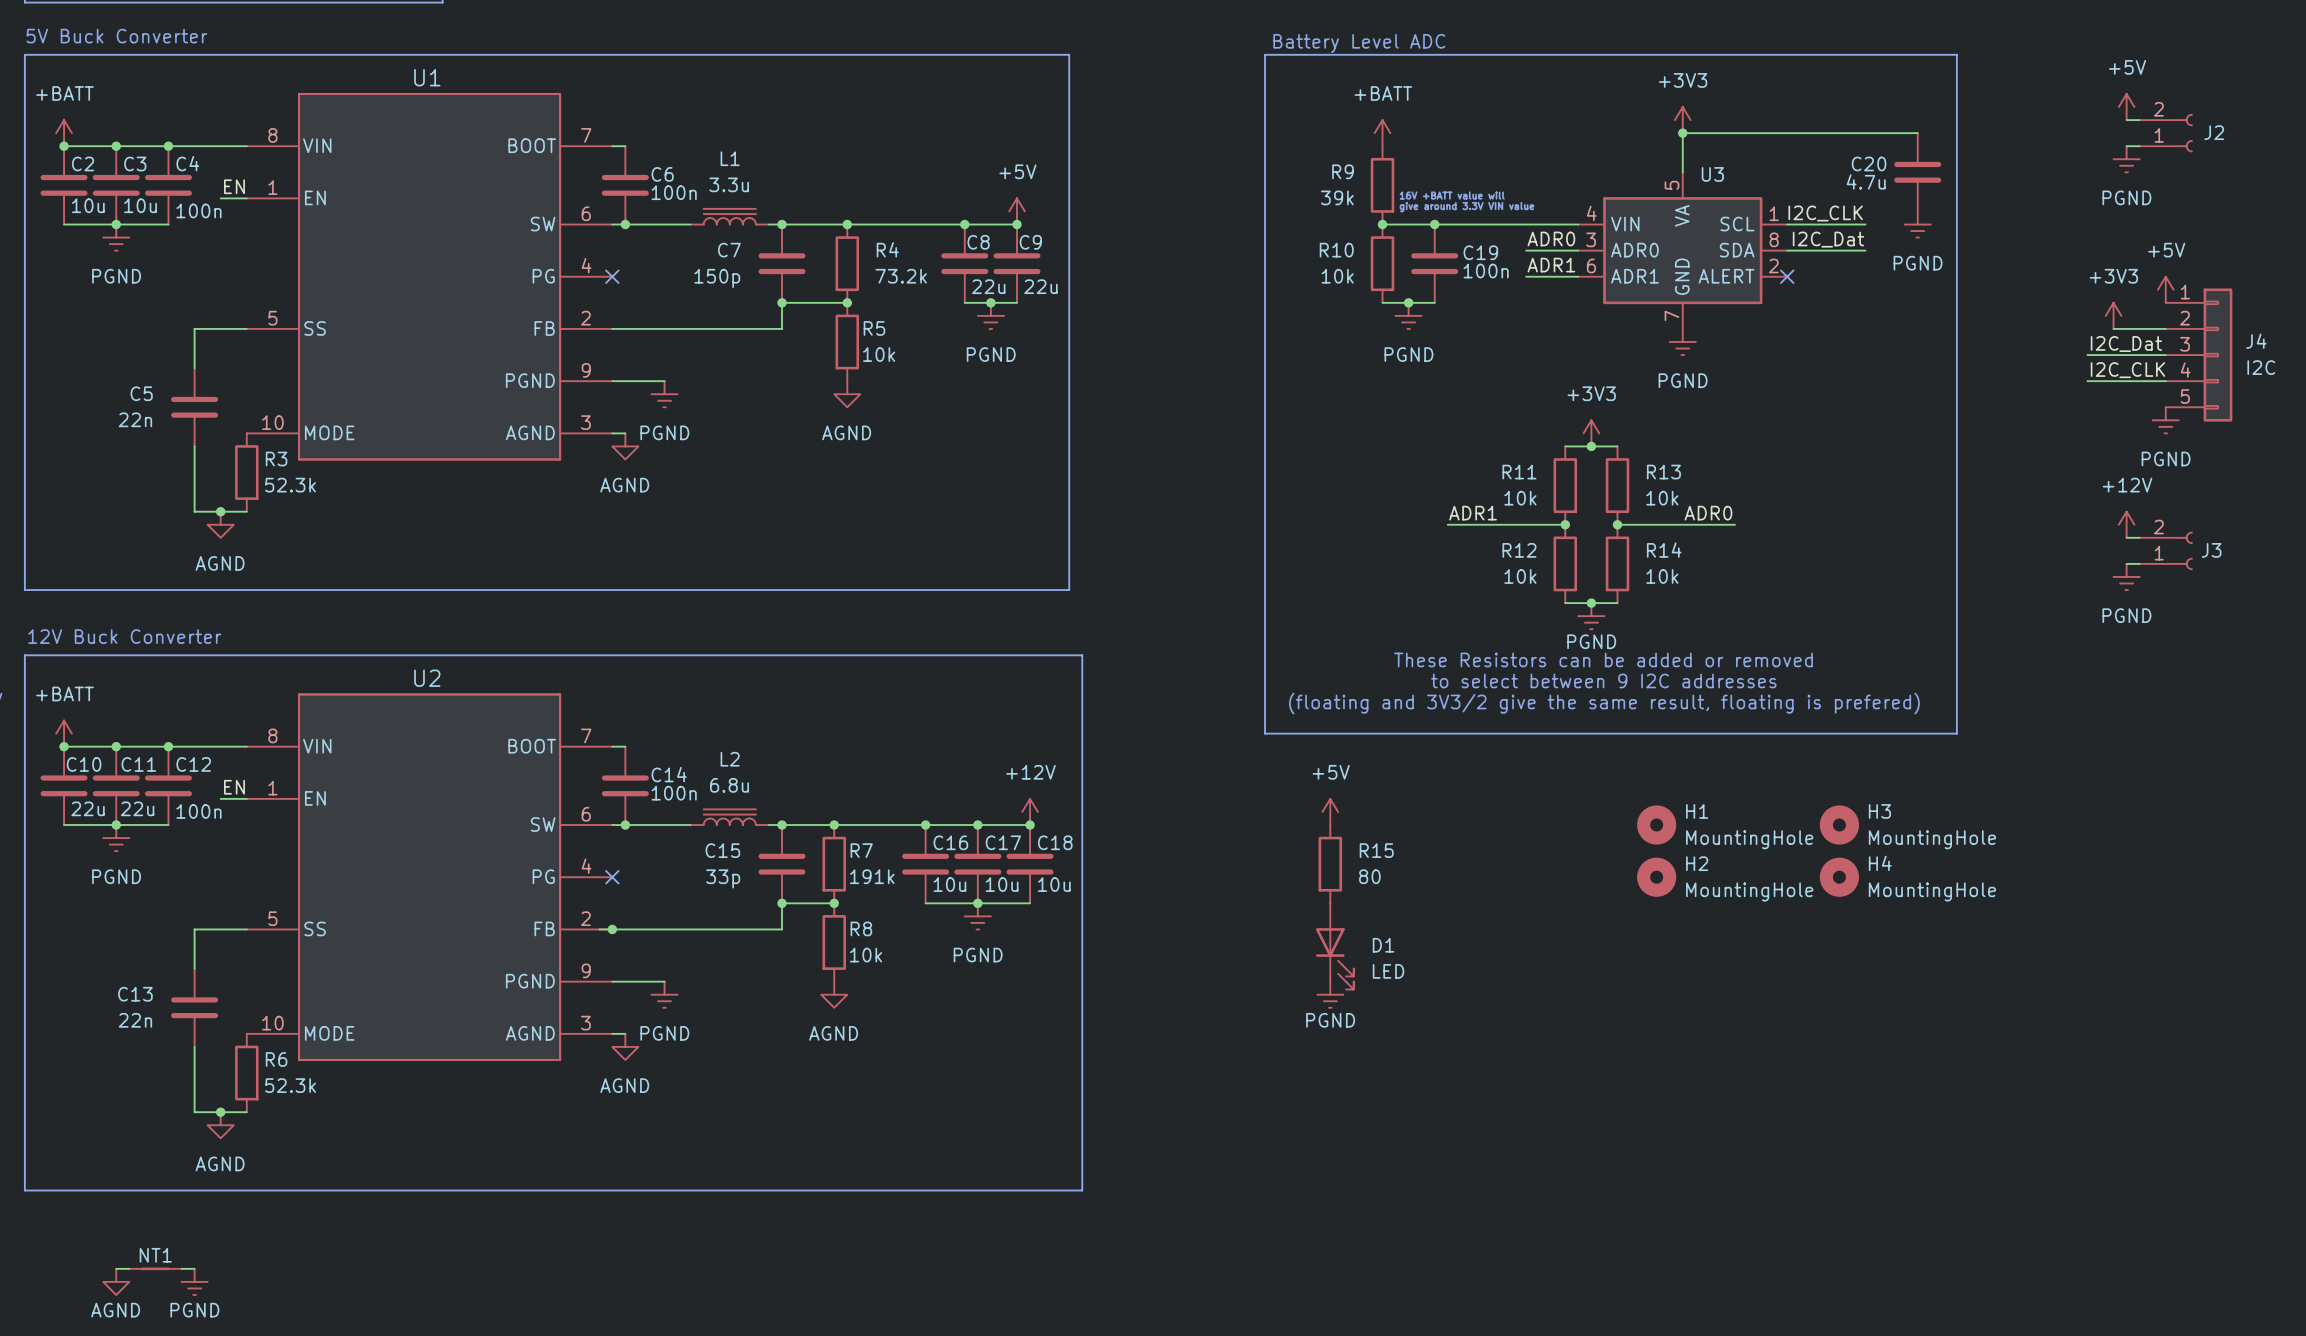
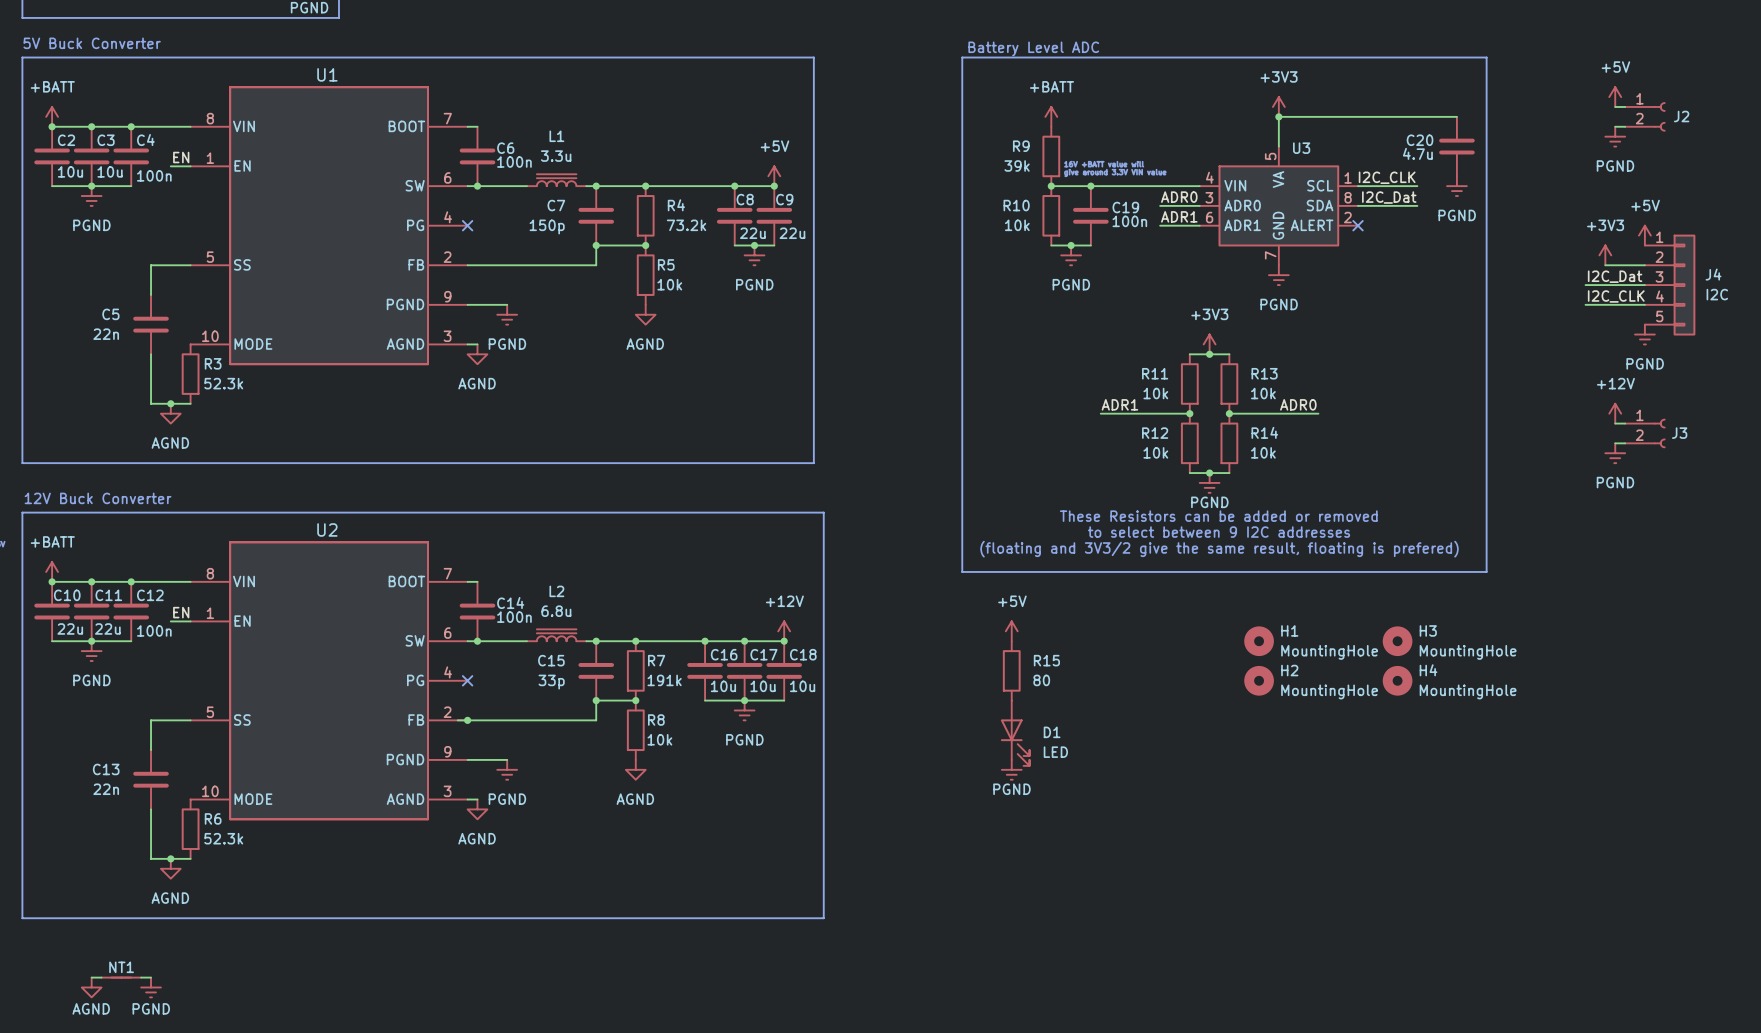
J2 flip: as is (2185, 133) -> up-down (1659, 116)
J3 flip: as is (2185, 550) -> up-down (1659, 433)

